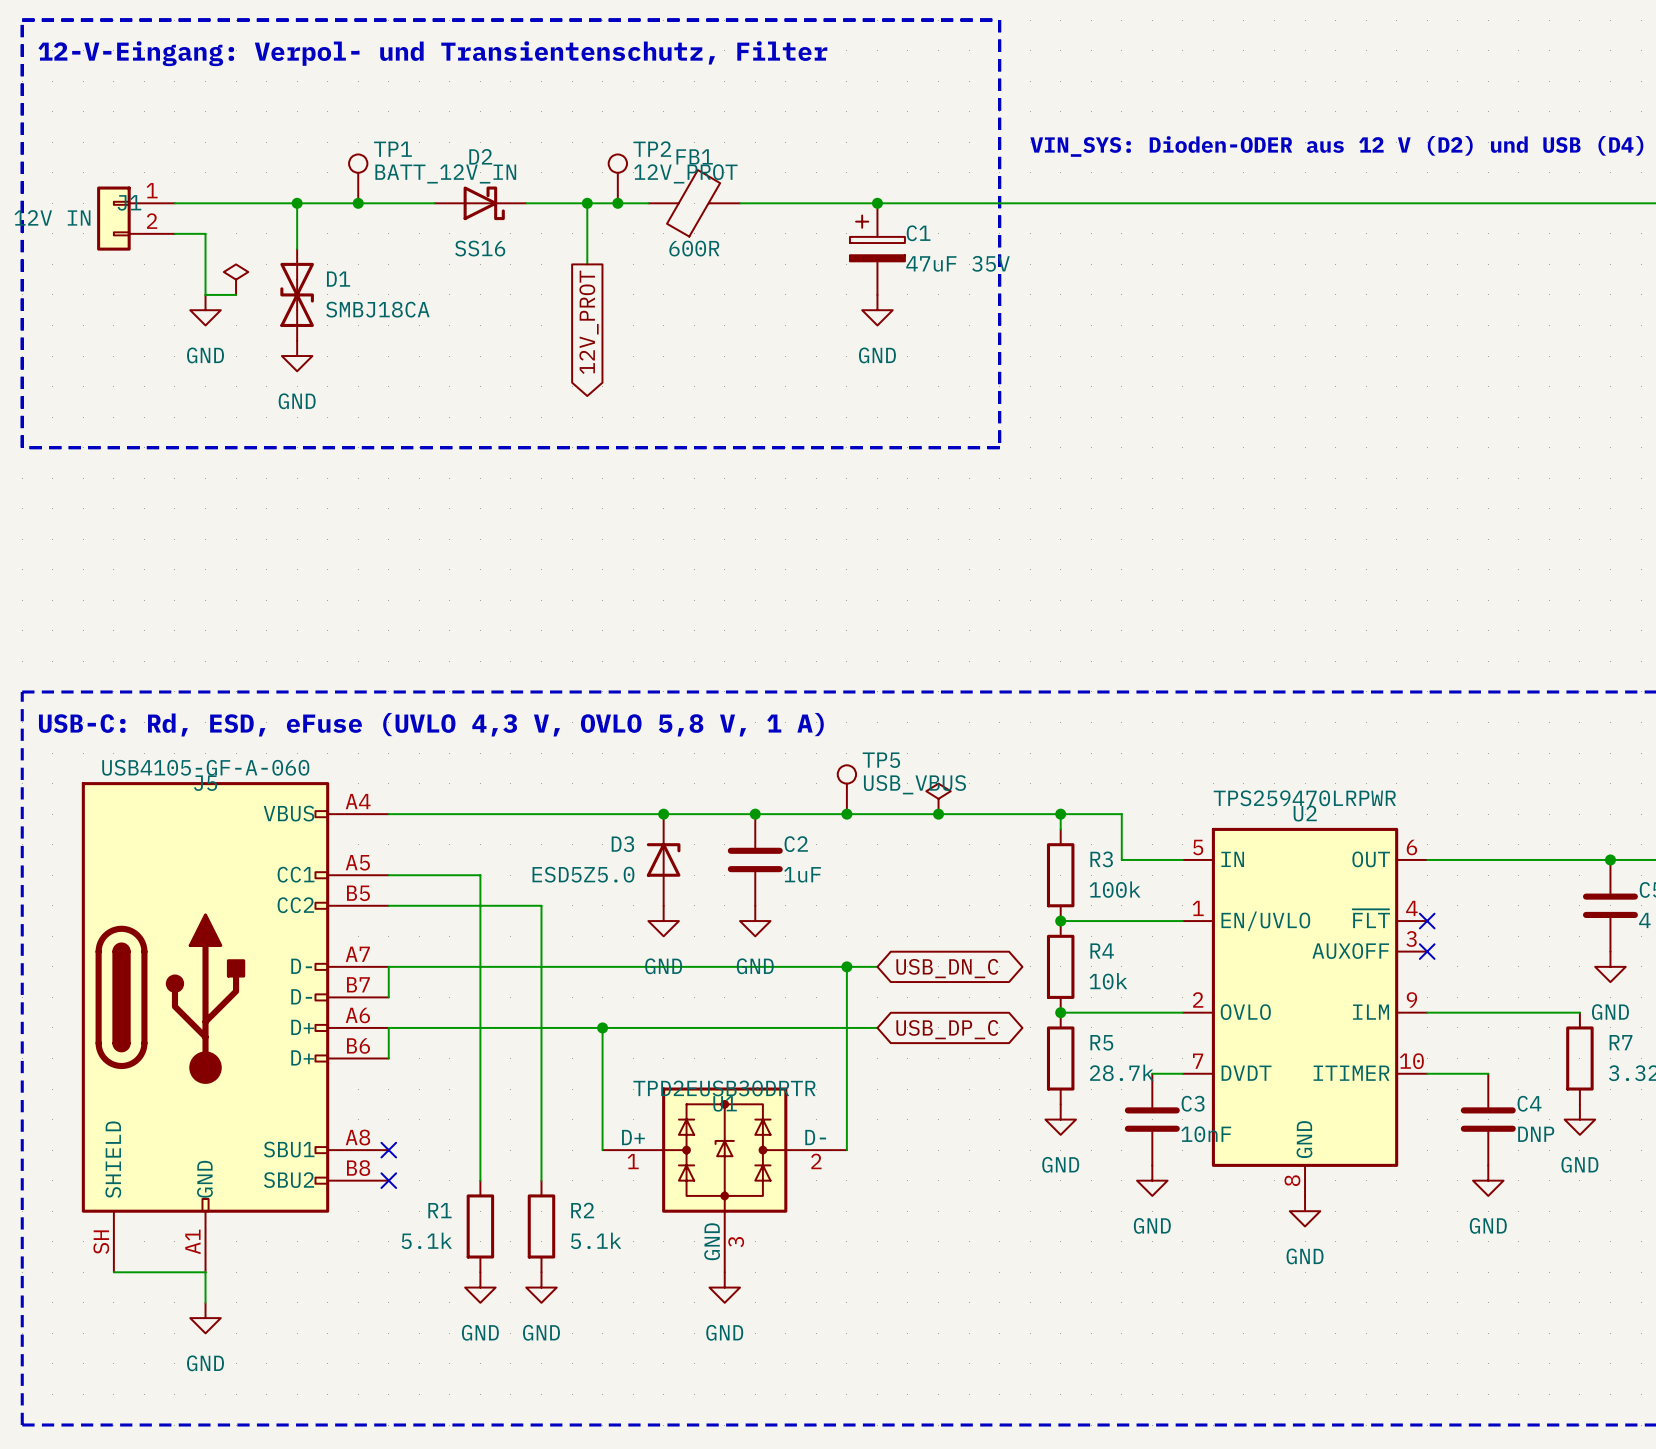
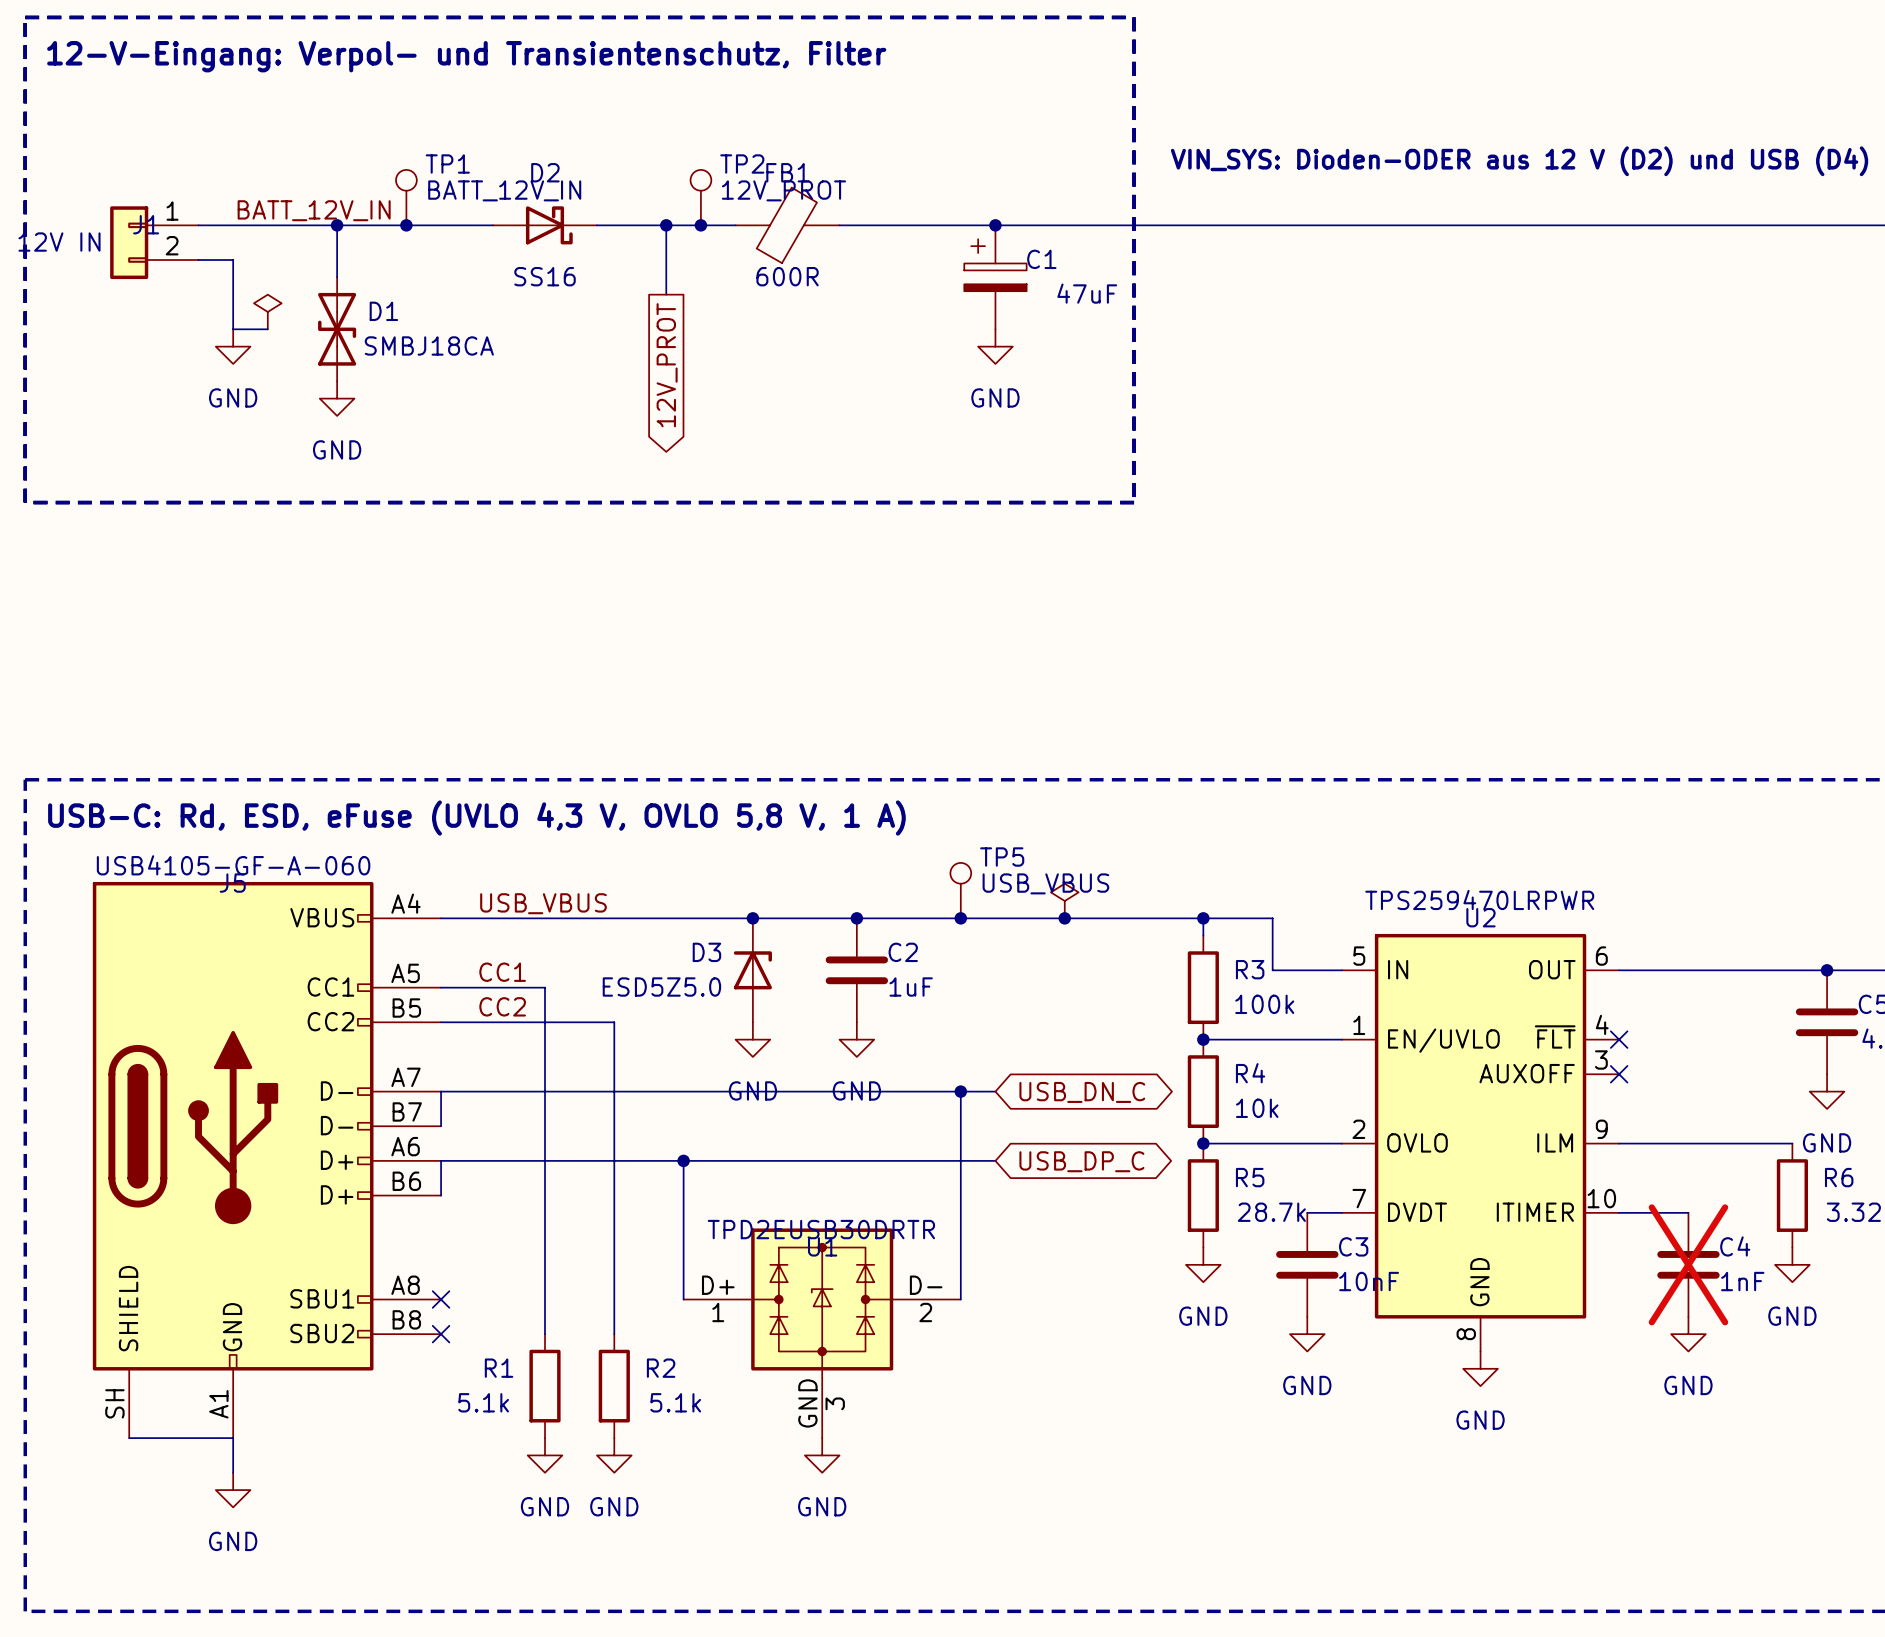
label: none -> BATT_12V_IN (314, 210)
C1 value: 47uF 35V (957, 263) -> 47uF (1087, 293)
label: none -> USB_VBUS (543, 903)
label: none -> CC1 (502, 972)
label: none -> CC2 (502, 1006)
R7 name: R7 (1621, 1042) -> R6 (1839, 1177)
C4 do-not-place cross: none -> (1688, 1264)
C4 value: DNP (1536, 1134) -> 1nF (1742, 1281)

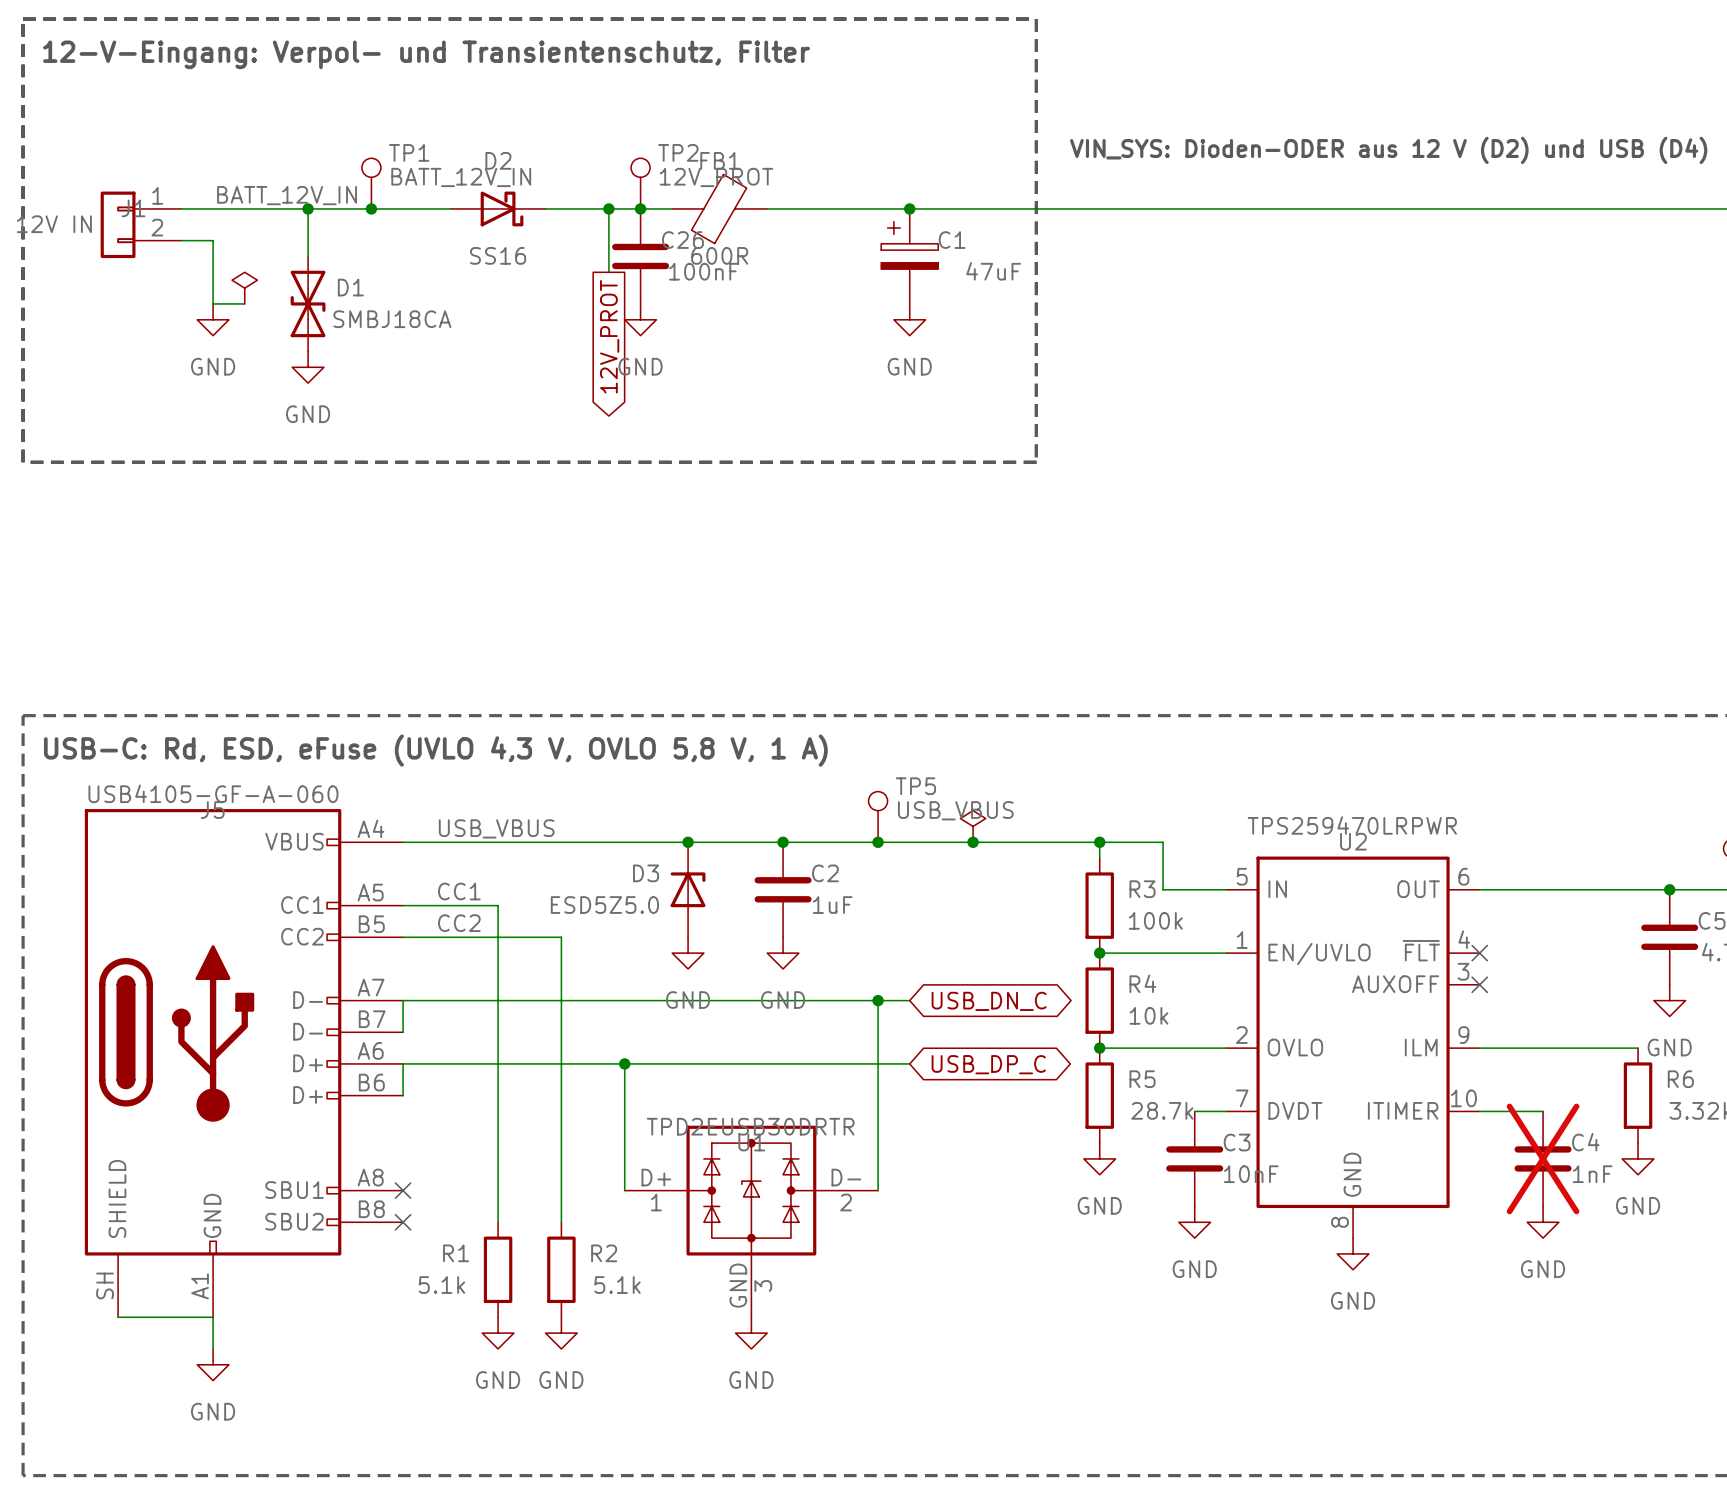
C26: none -> 100nF (640, 256)
power symbol: none -> GND (640, 319)

